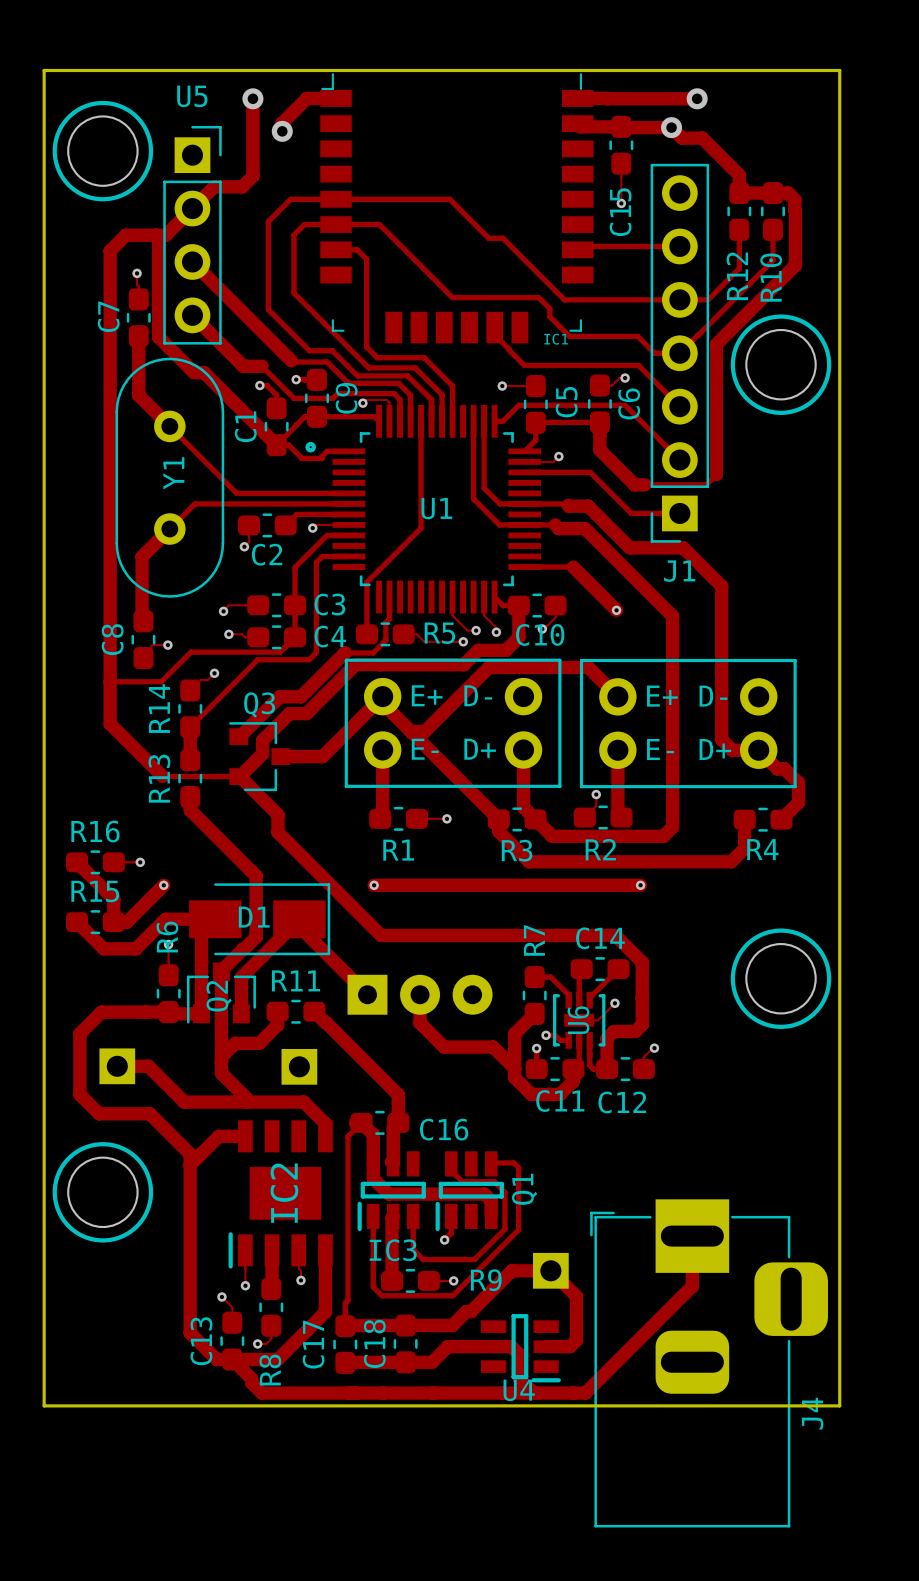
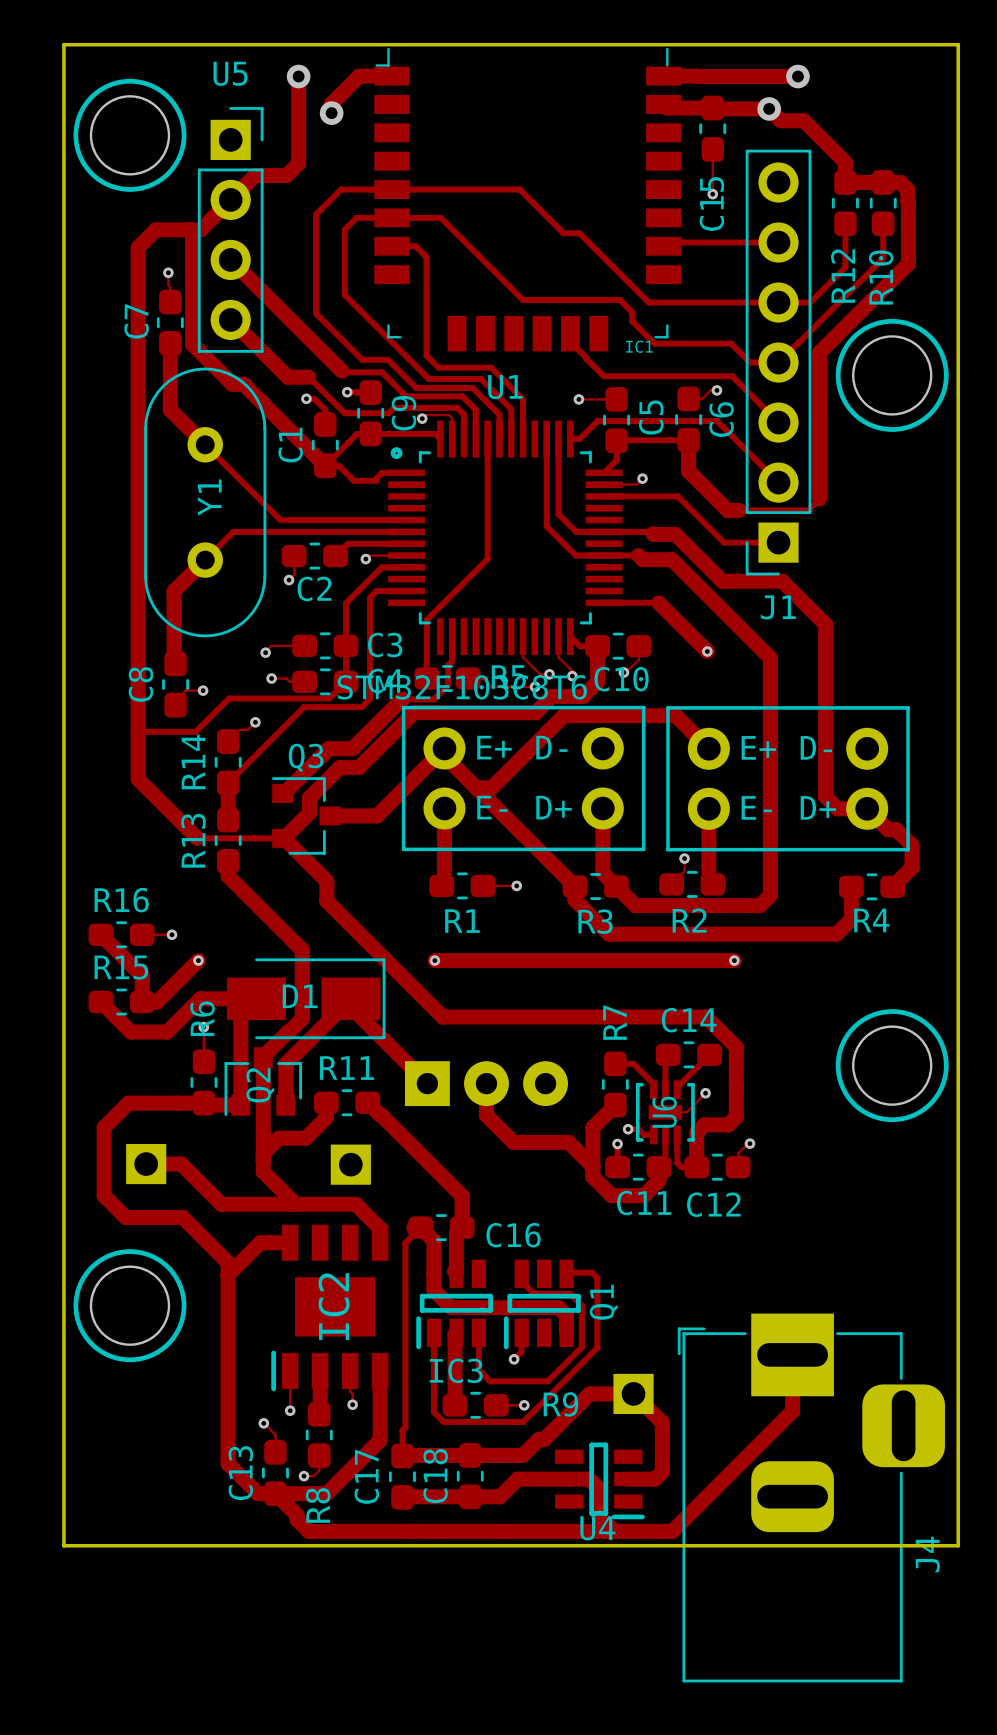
U1 footprint: [305, 404, 542, 614] -> [388, 420, 623, 656]
U1 name position: U1 (436, 508) -> U1 (505, 387)
U1 value: none -> STM32F103C8T6 (462, 687)

